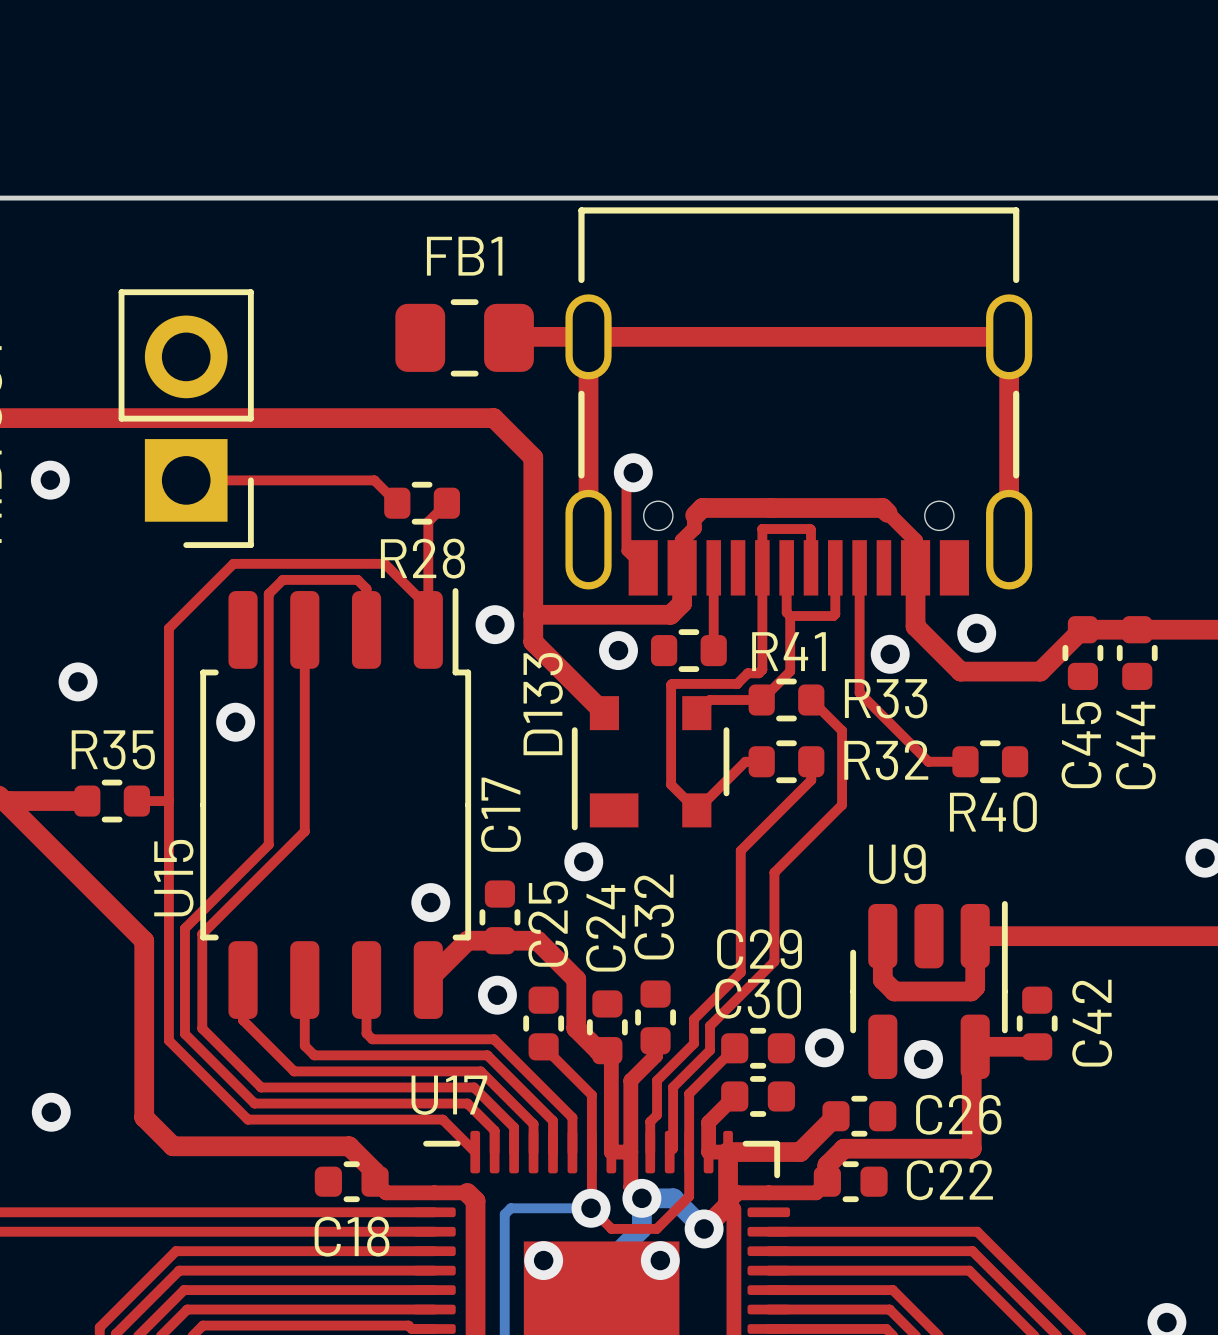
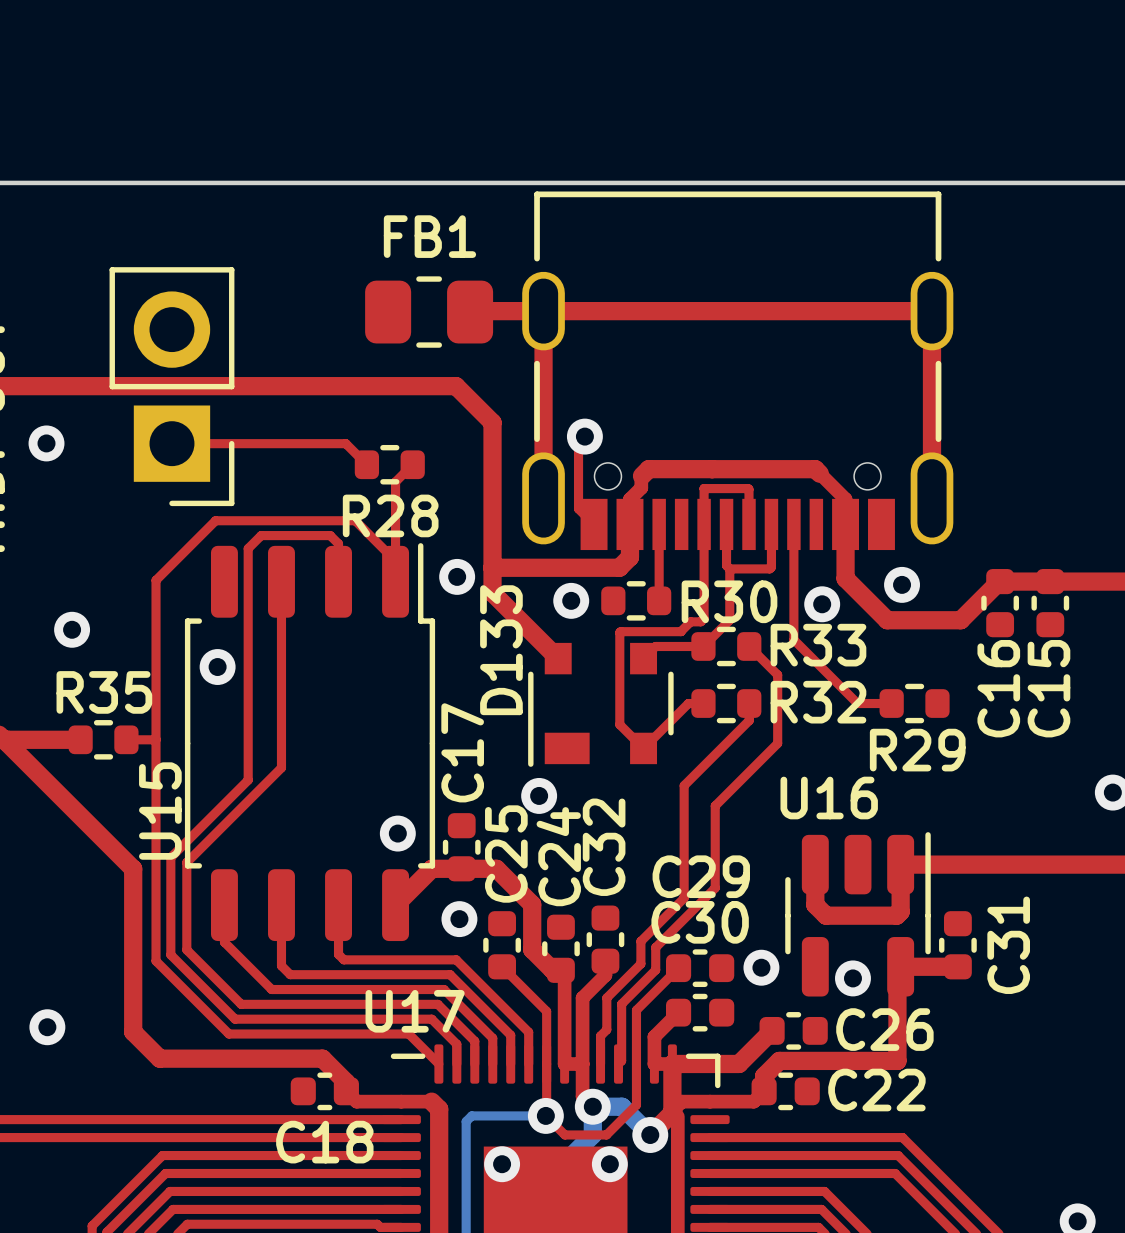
R41 name: R41 (788, 651) -> R30 (729, 601)
C45 name: C45 (1081, 745) -> C16 (998, 688)
C44 name: C44 (1135, 745) -> C15 (1048, 688)
R40 name: R40 (993, 812) -> R29 (917, 750)
U9 name: U9 (897, 864) -> U16 (829, 797)
C42 name: C42 (1092, 1023) -> C31 (1008, 945)

